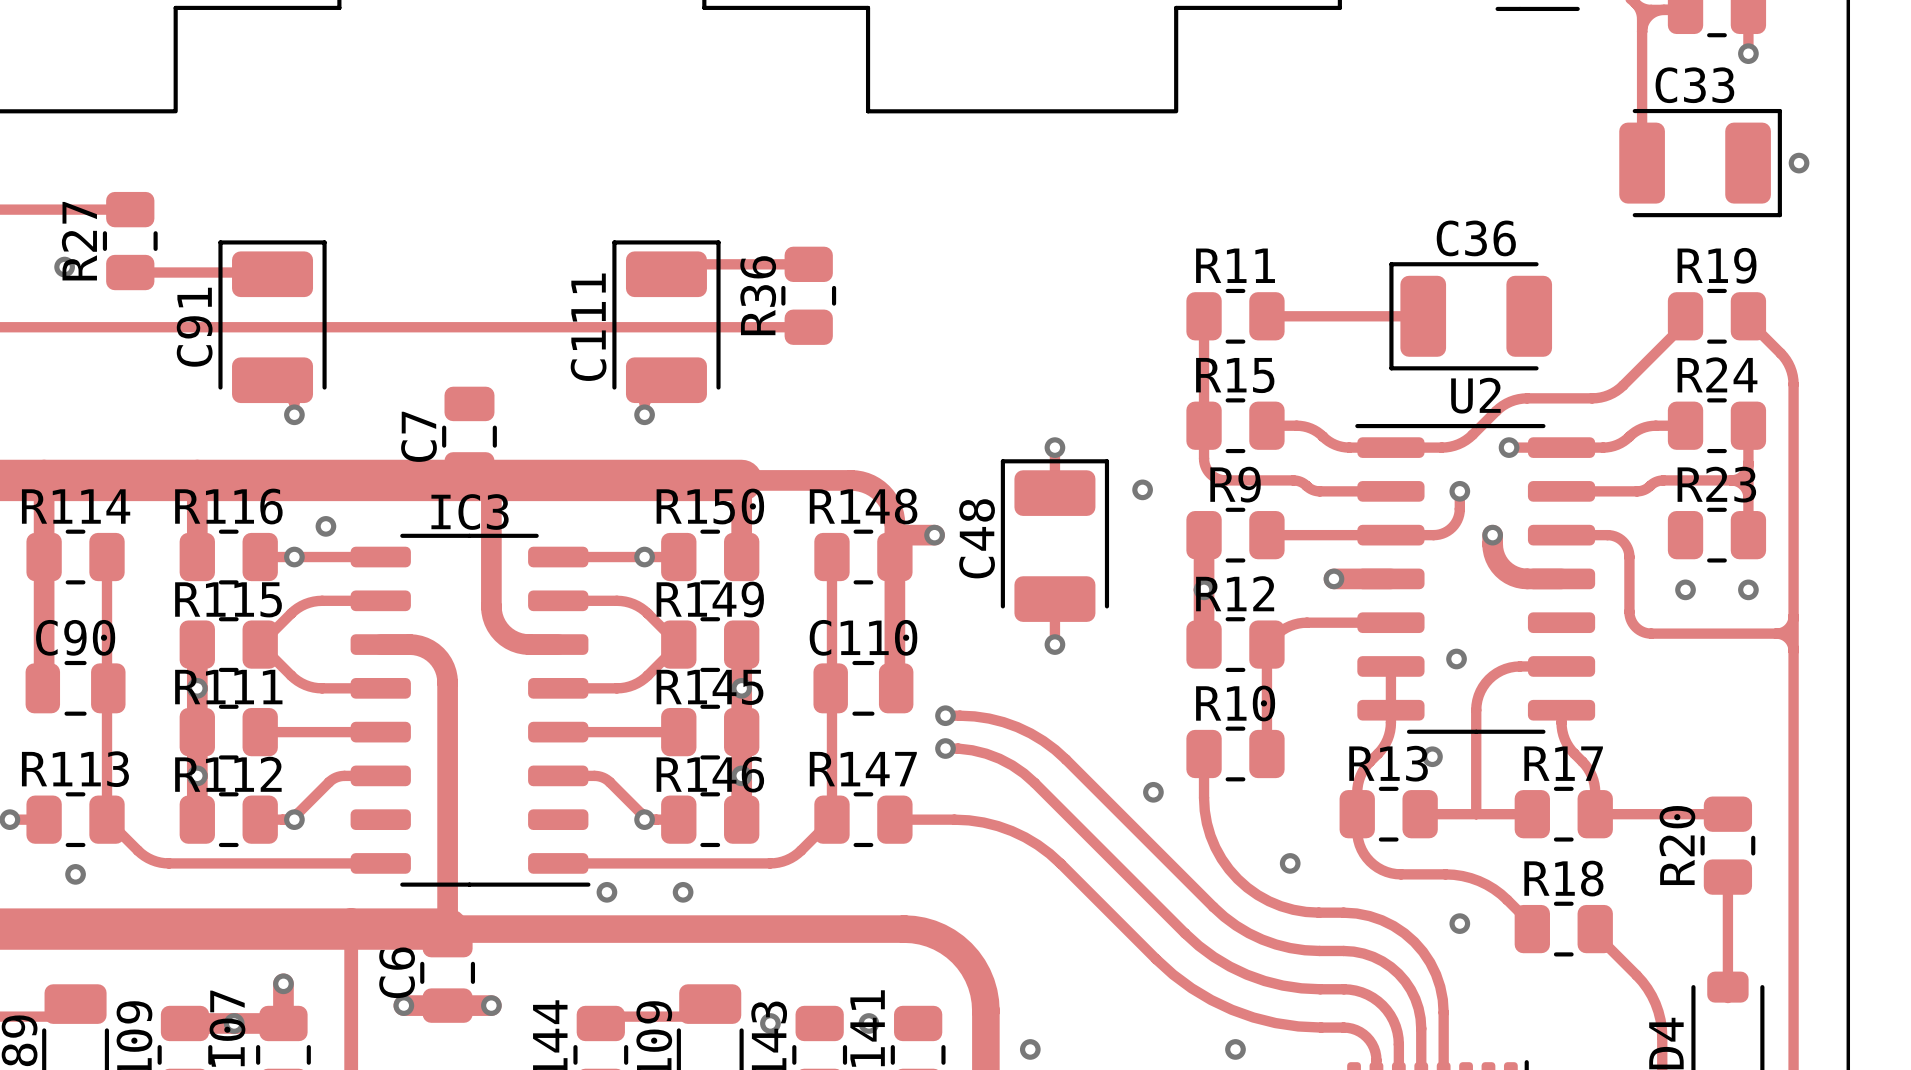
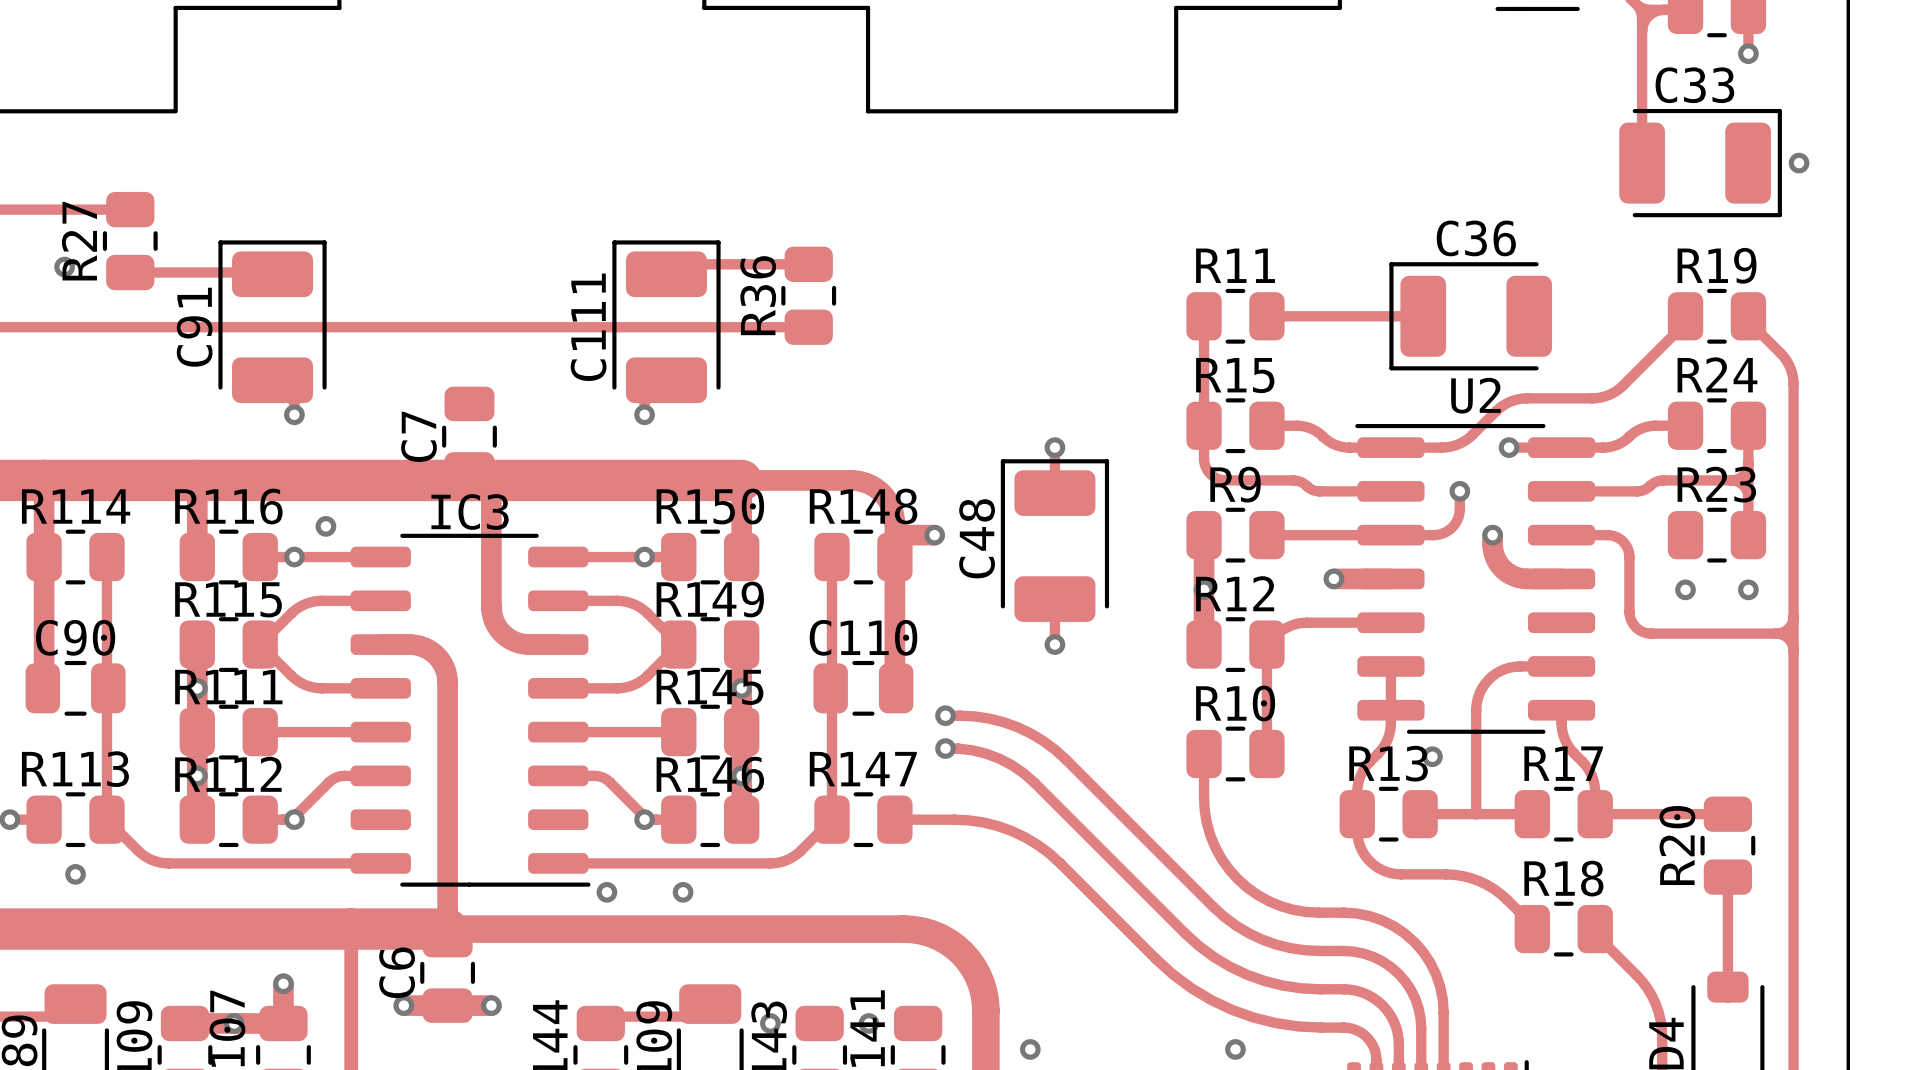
via: (1142, 489) -> none
via: (1456, 659) -> none
via: (1153, 792) -> none
via: (1290, 863) -> none
via: (1459, 923) -> none

